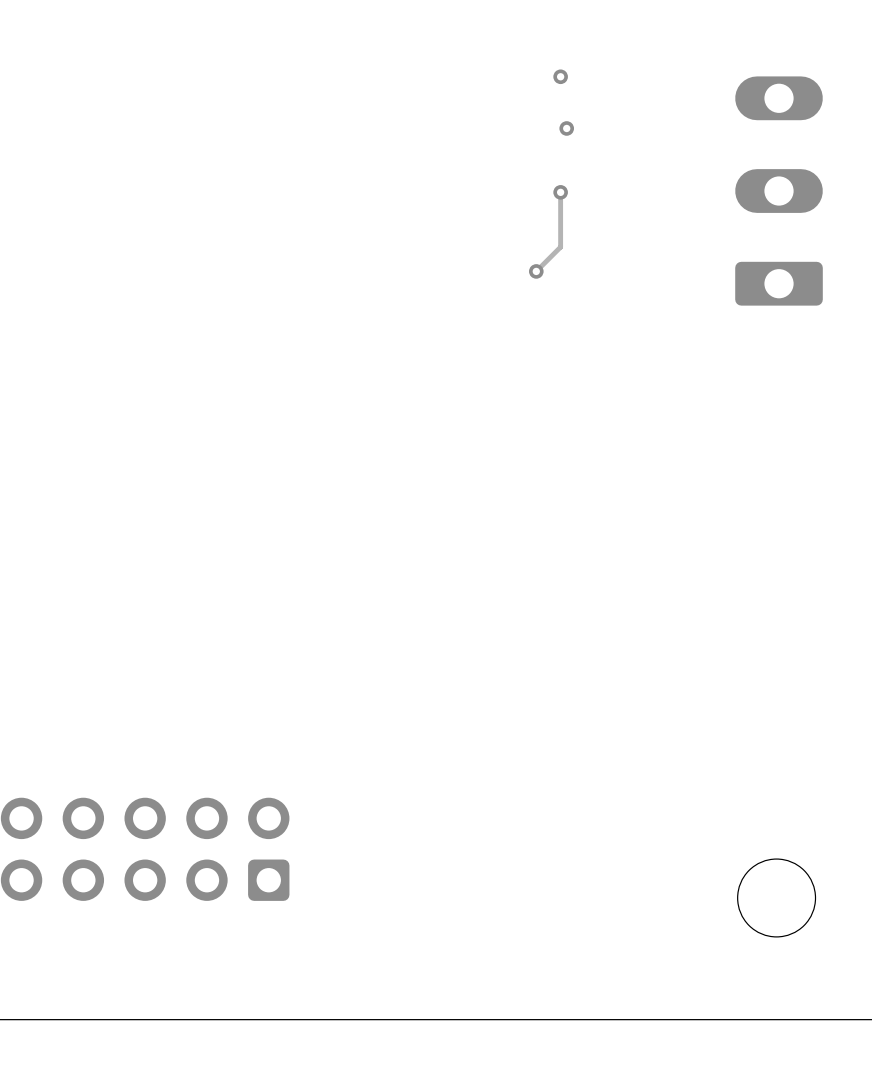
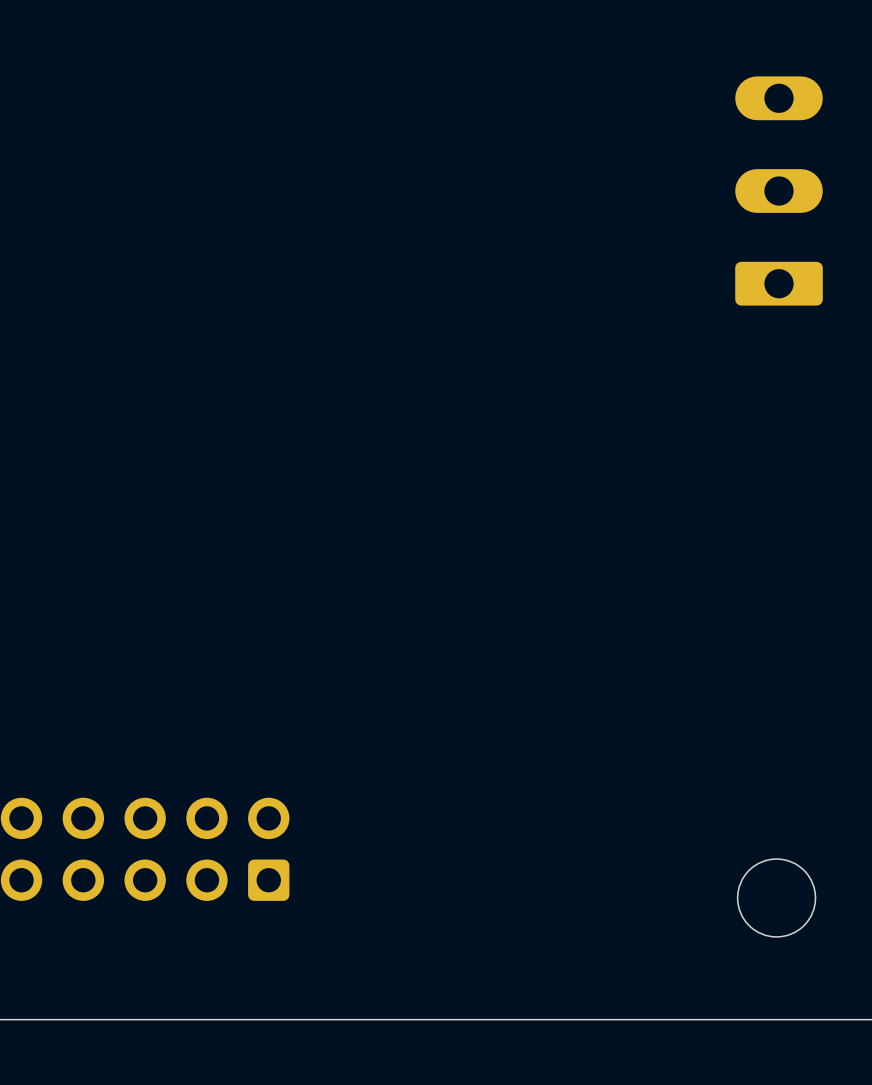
via: (560, 76) -> none
via: (566, 128) -> none
track: (560, 192) (560, 247) (536, 271) -> none
via: (560, 192) -> none
via: (536, 271) -> none

